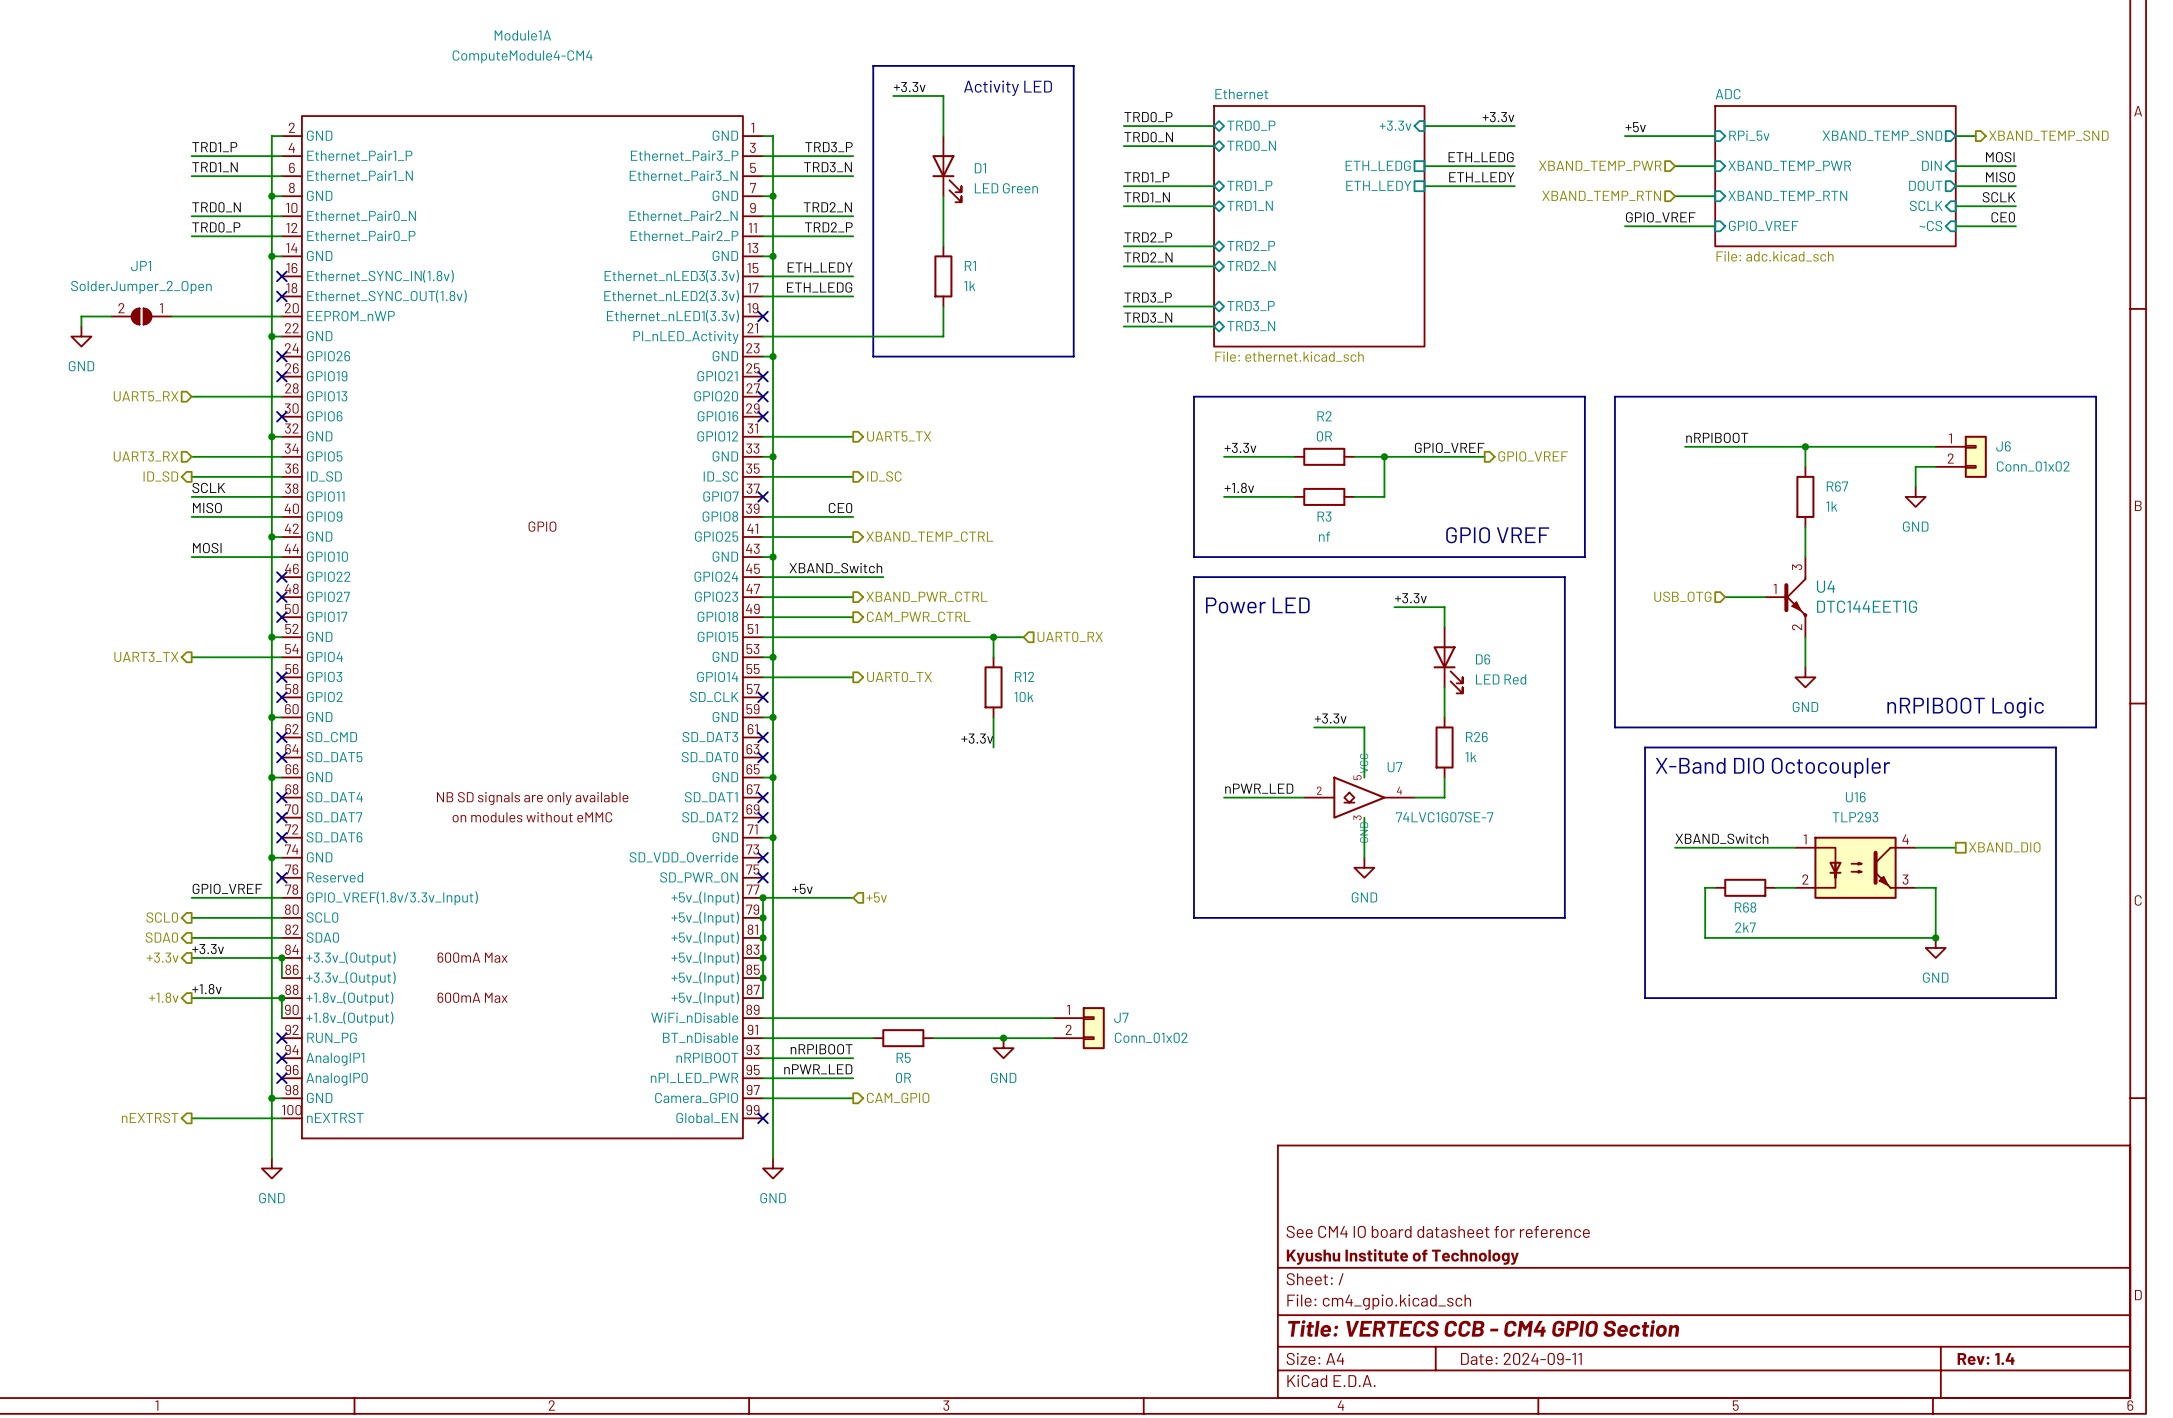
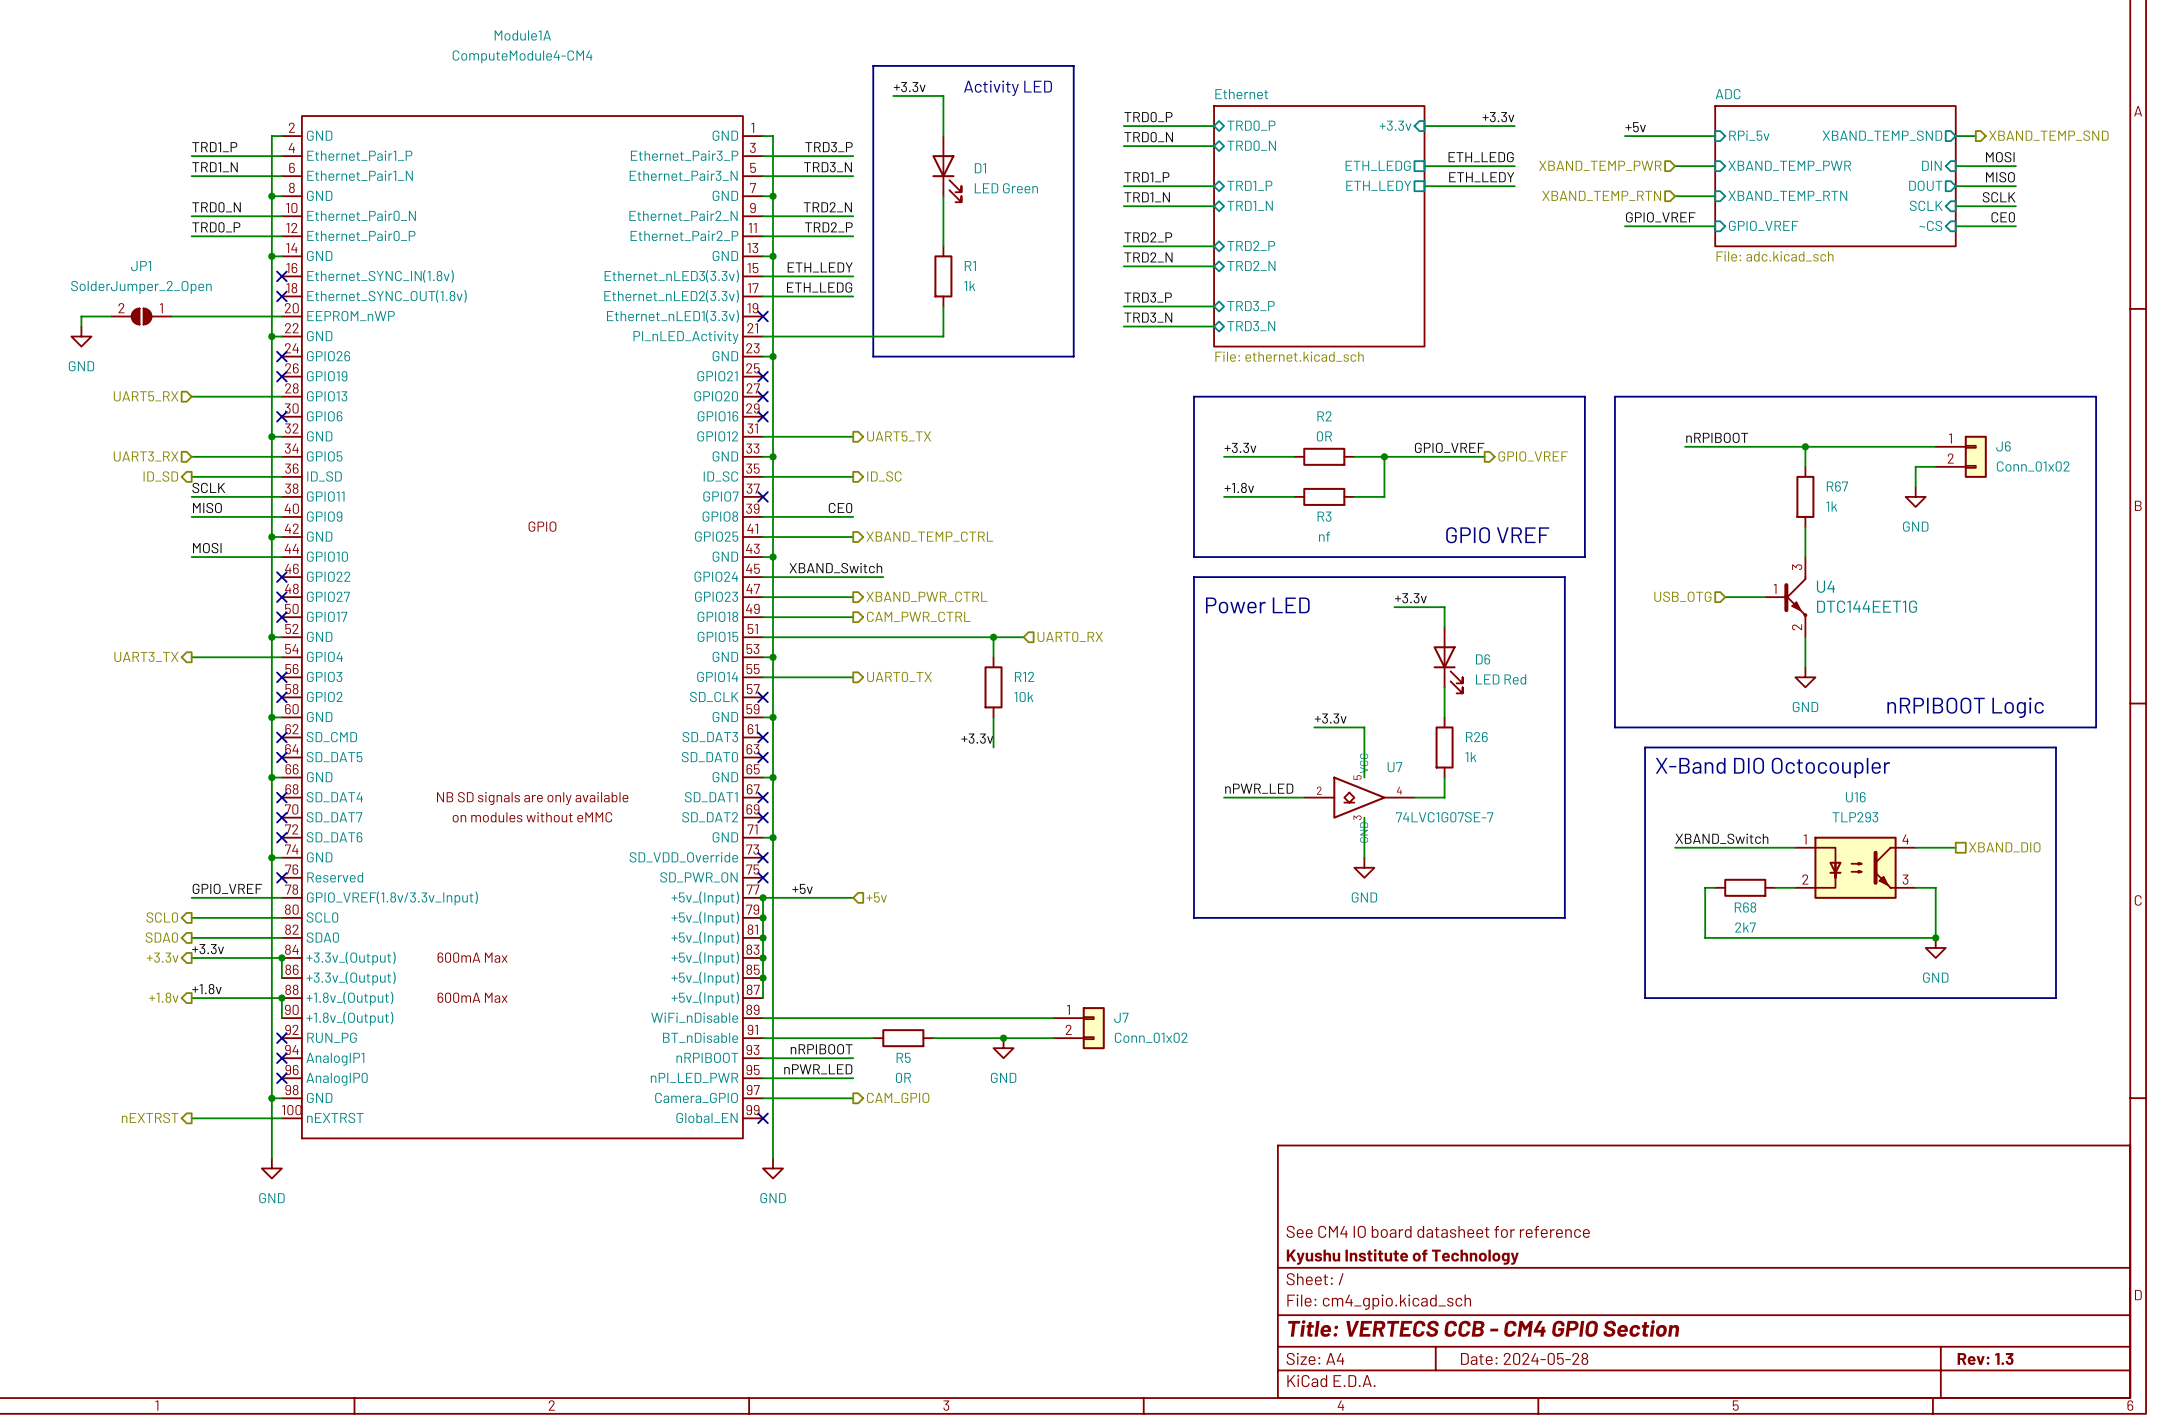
title block: Date: 2024-09-11 (1521, 1358) -> Date: 2024-05-28 (1524, 1358)
title block: Rev: 1.4 (1986, 1359) -> Rev: 1.3 (1985, 1359)

